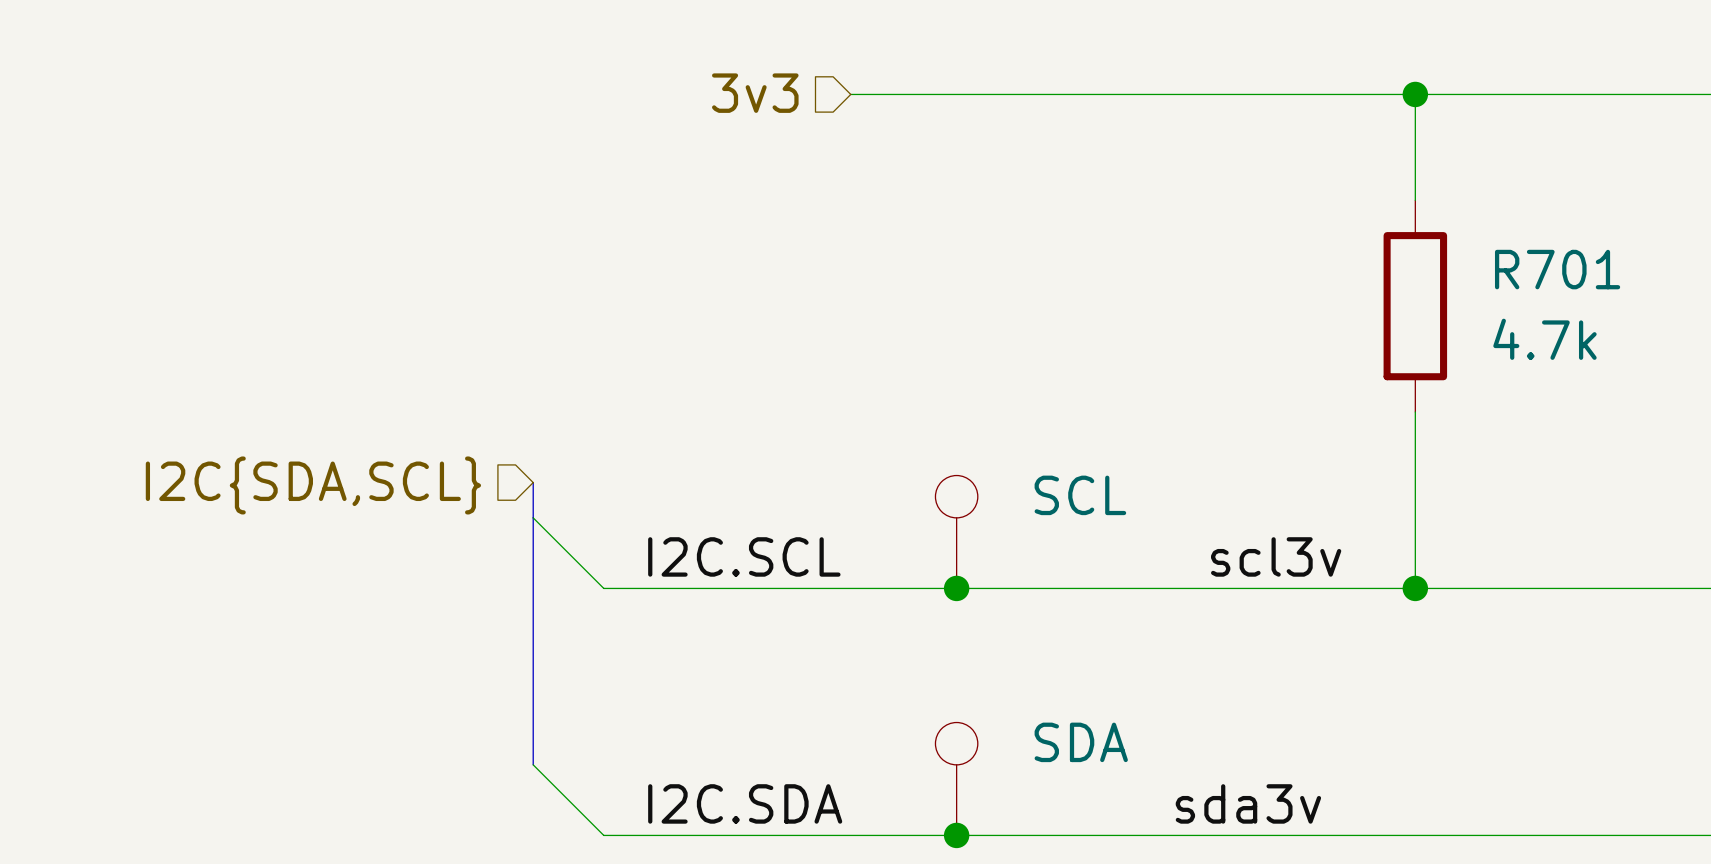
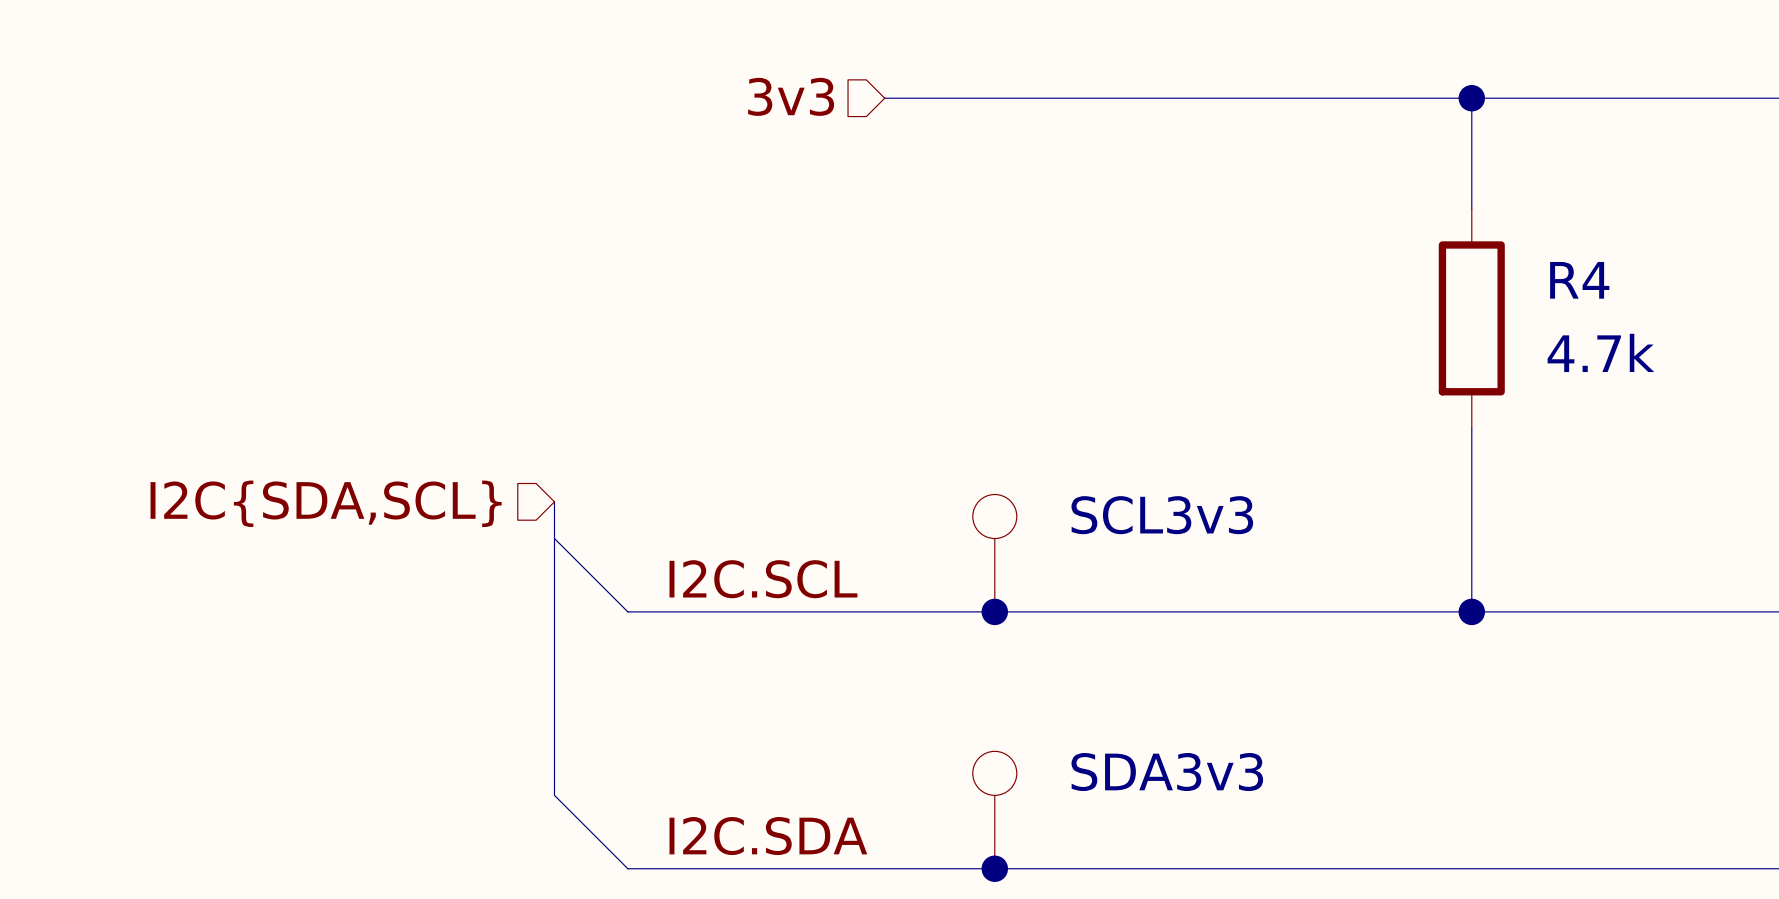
R701 name: R701 (1557, 269) -> R4 (1579, 280)
part text: SCL (1080, 495) -> SCL3v3 (1162, 515)
label: scl3v (1276, 556) -> none
part text: SDA (1081, 742) -> SDA3v3 (1167, 772)
label: sda3v (1248, 803) -> none

